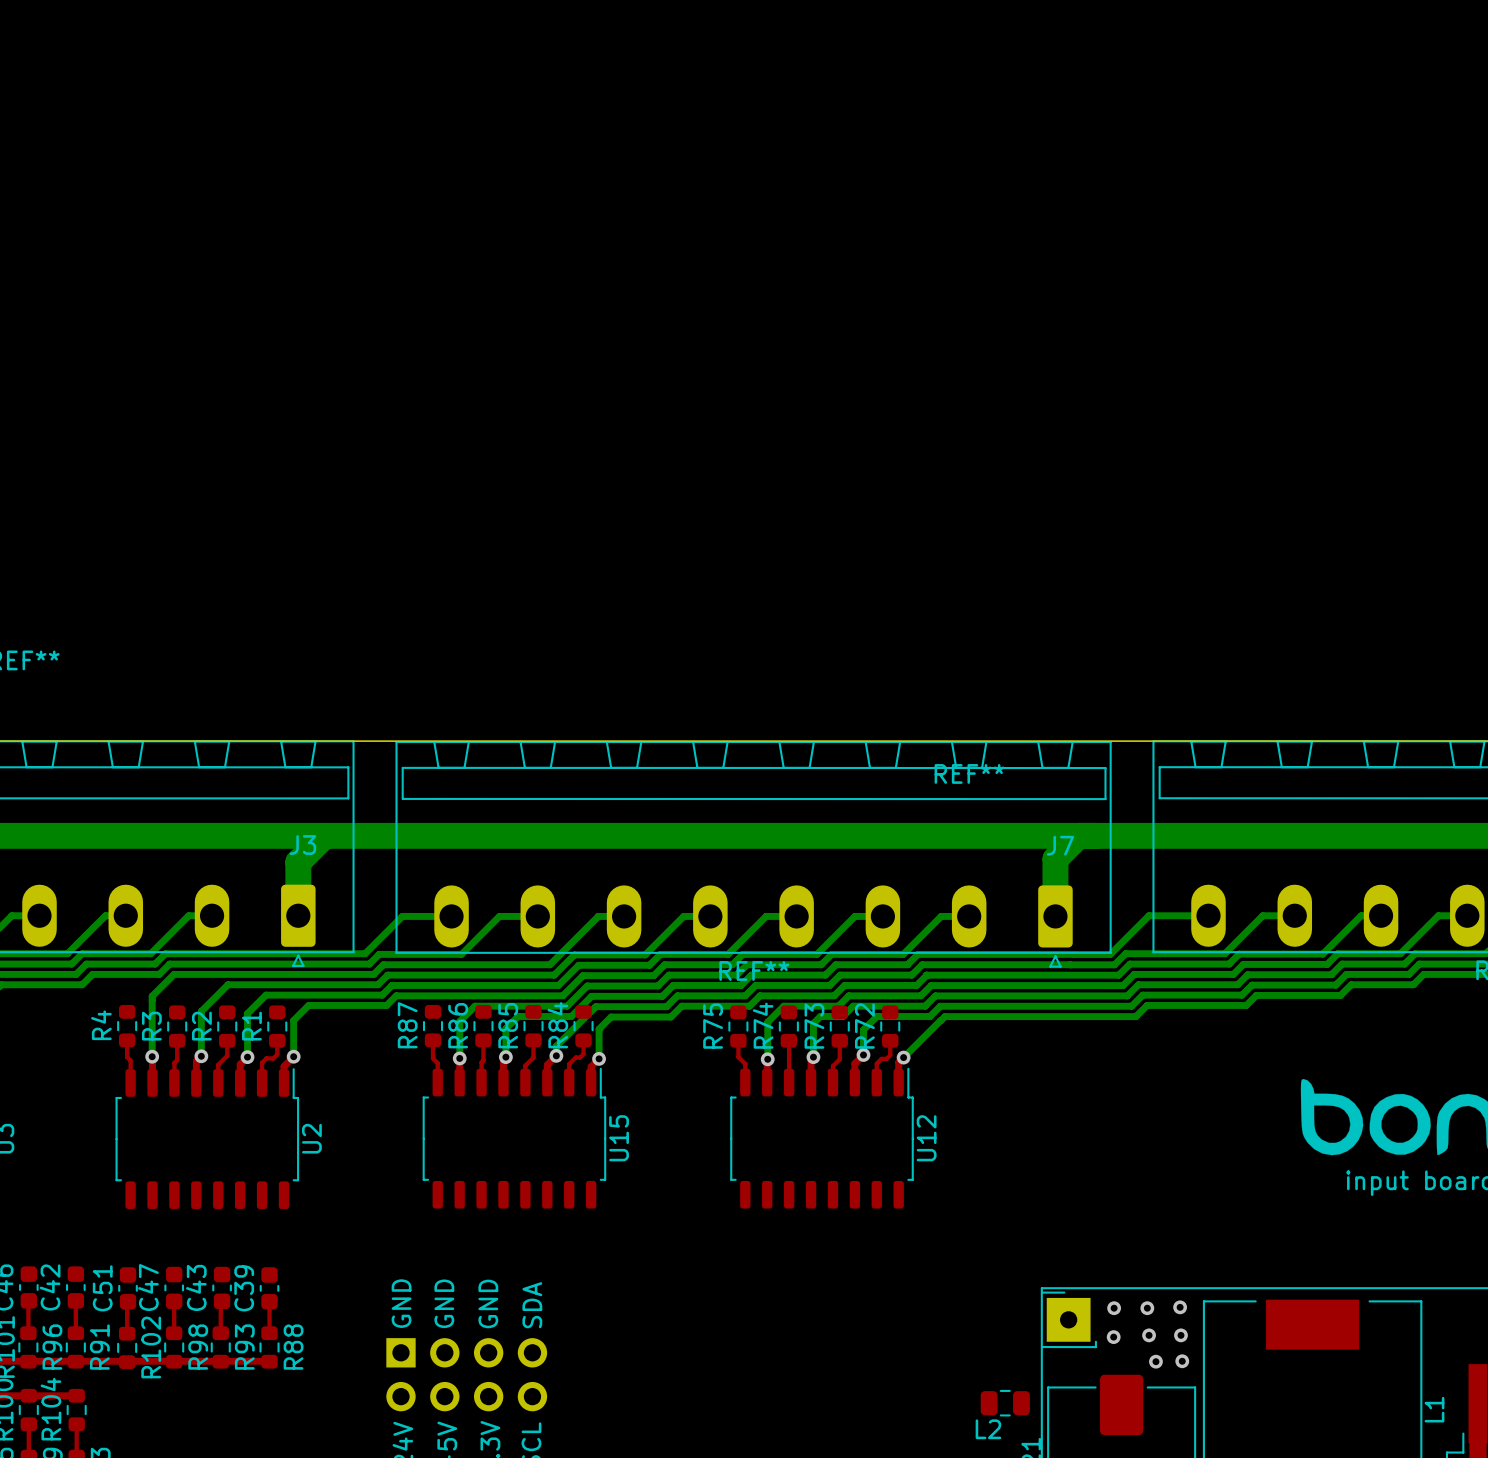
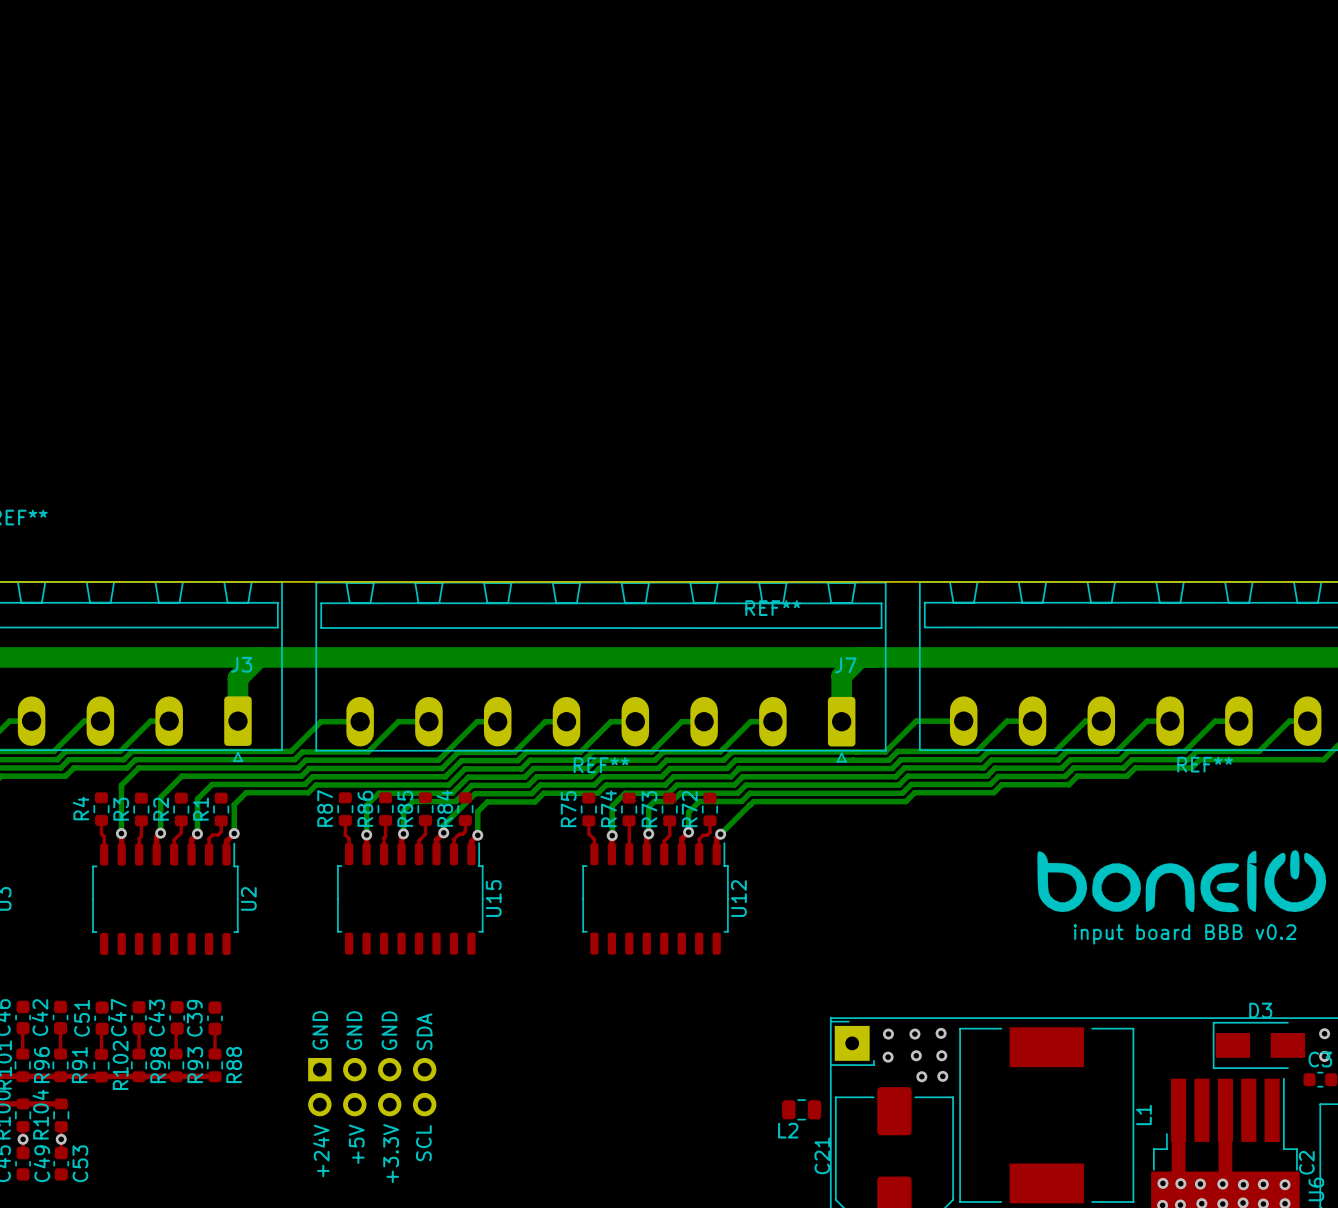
via: none -> (23, 1139)
via: none -> (61, 1139)

